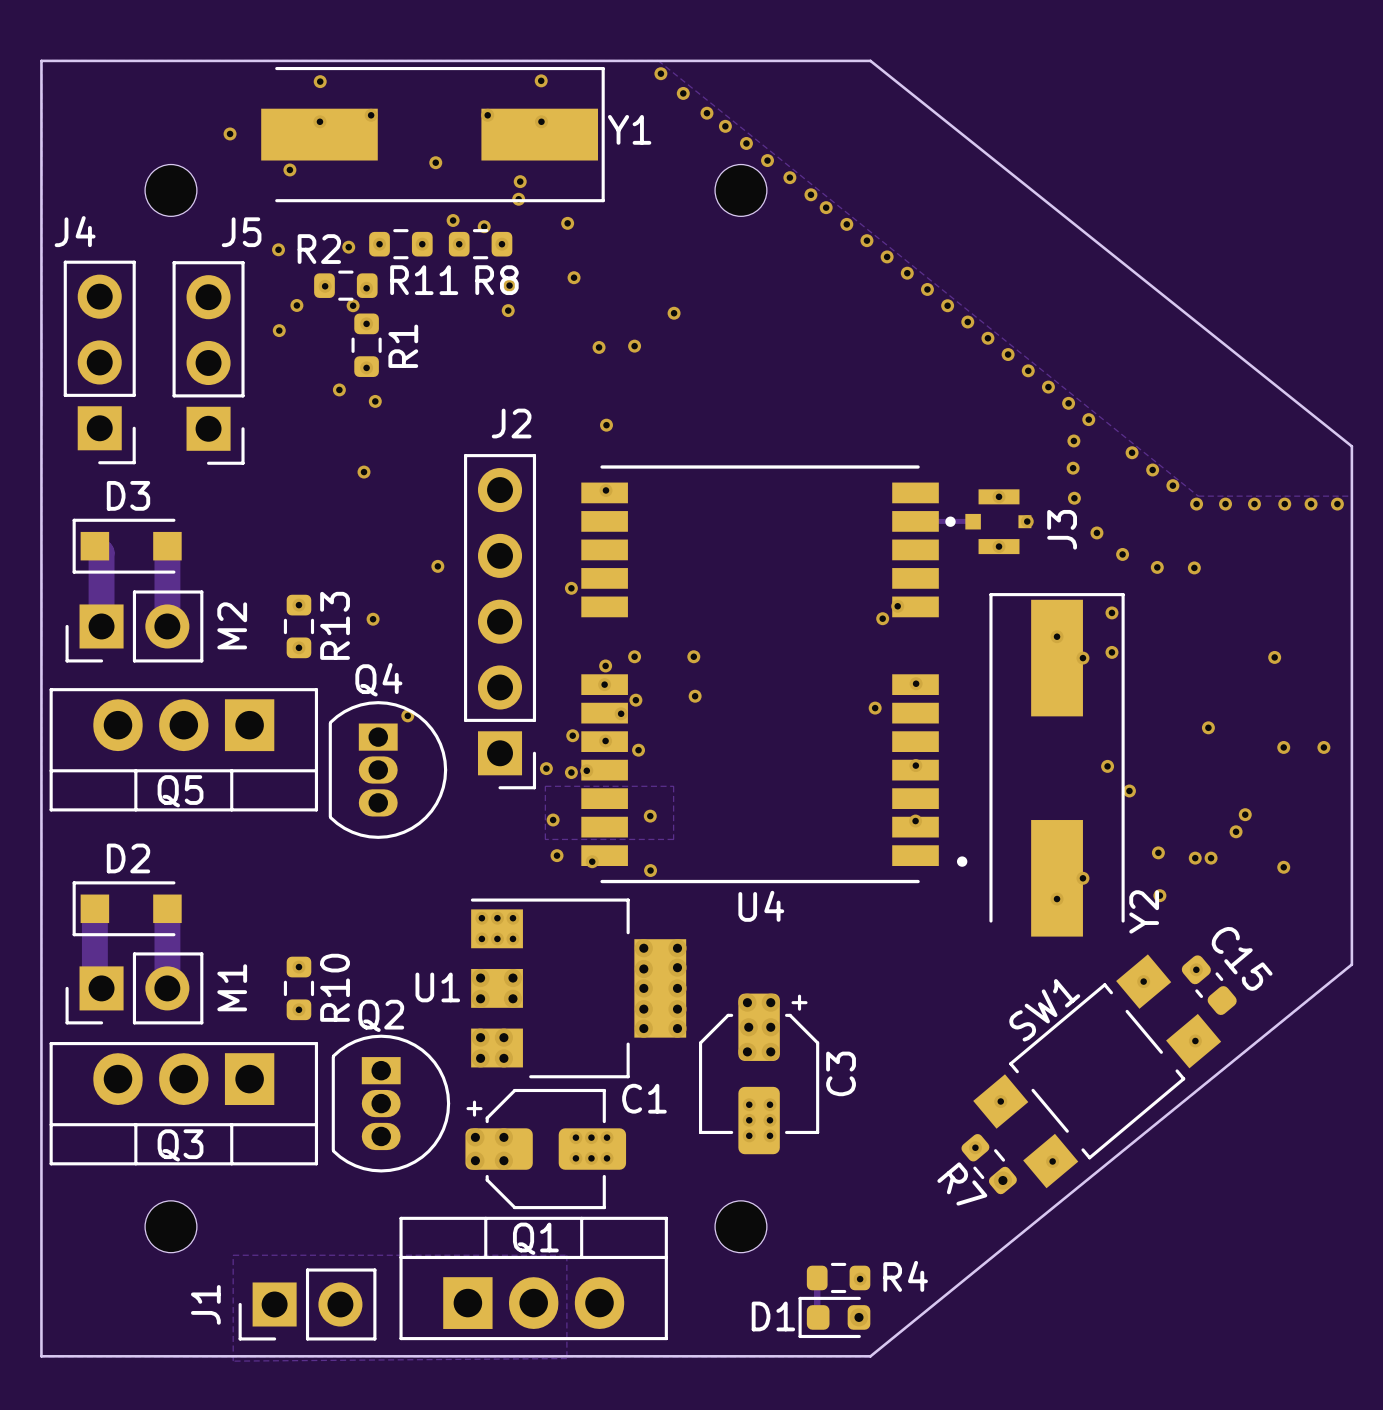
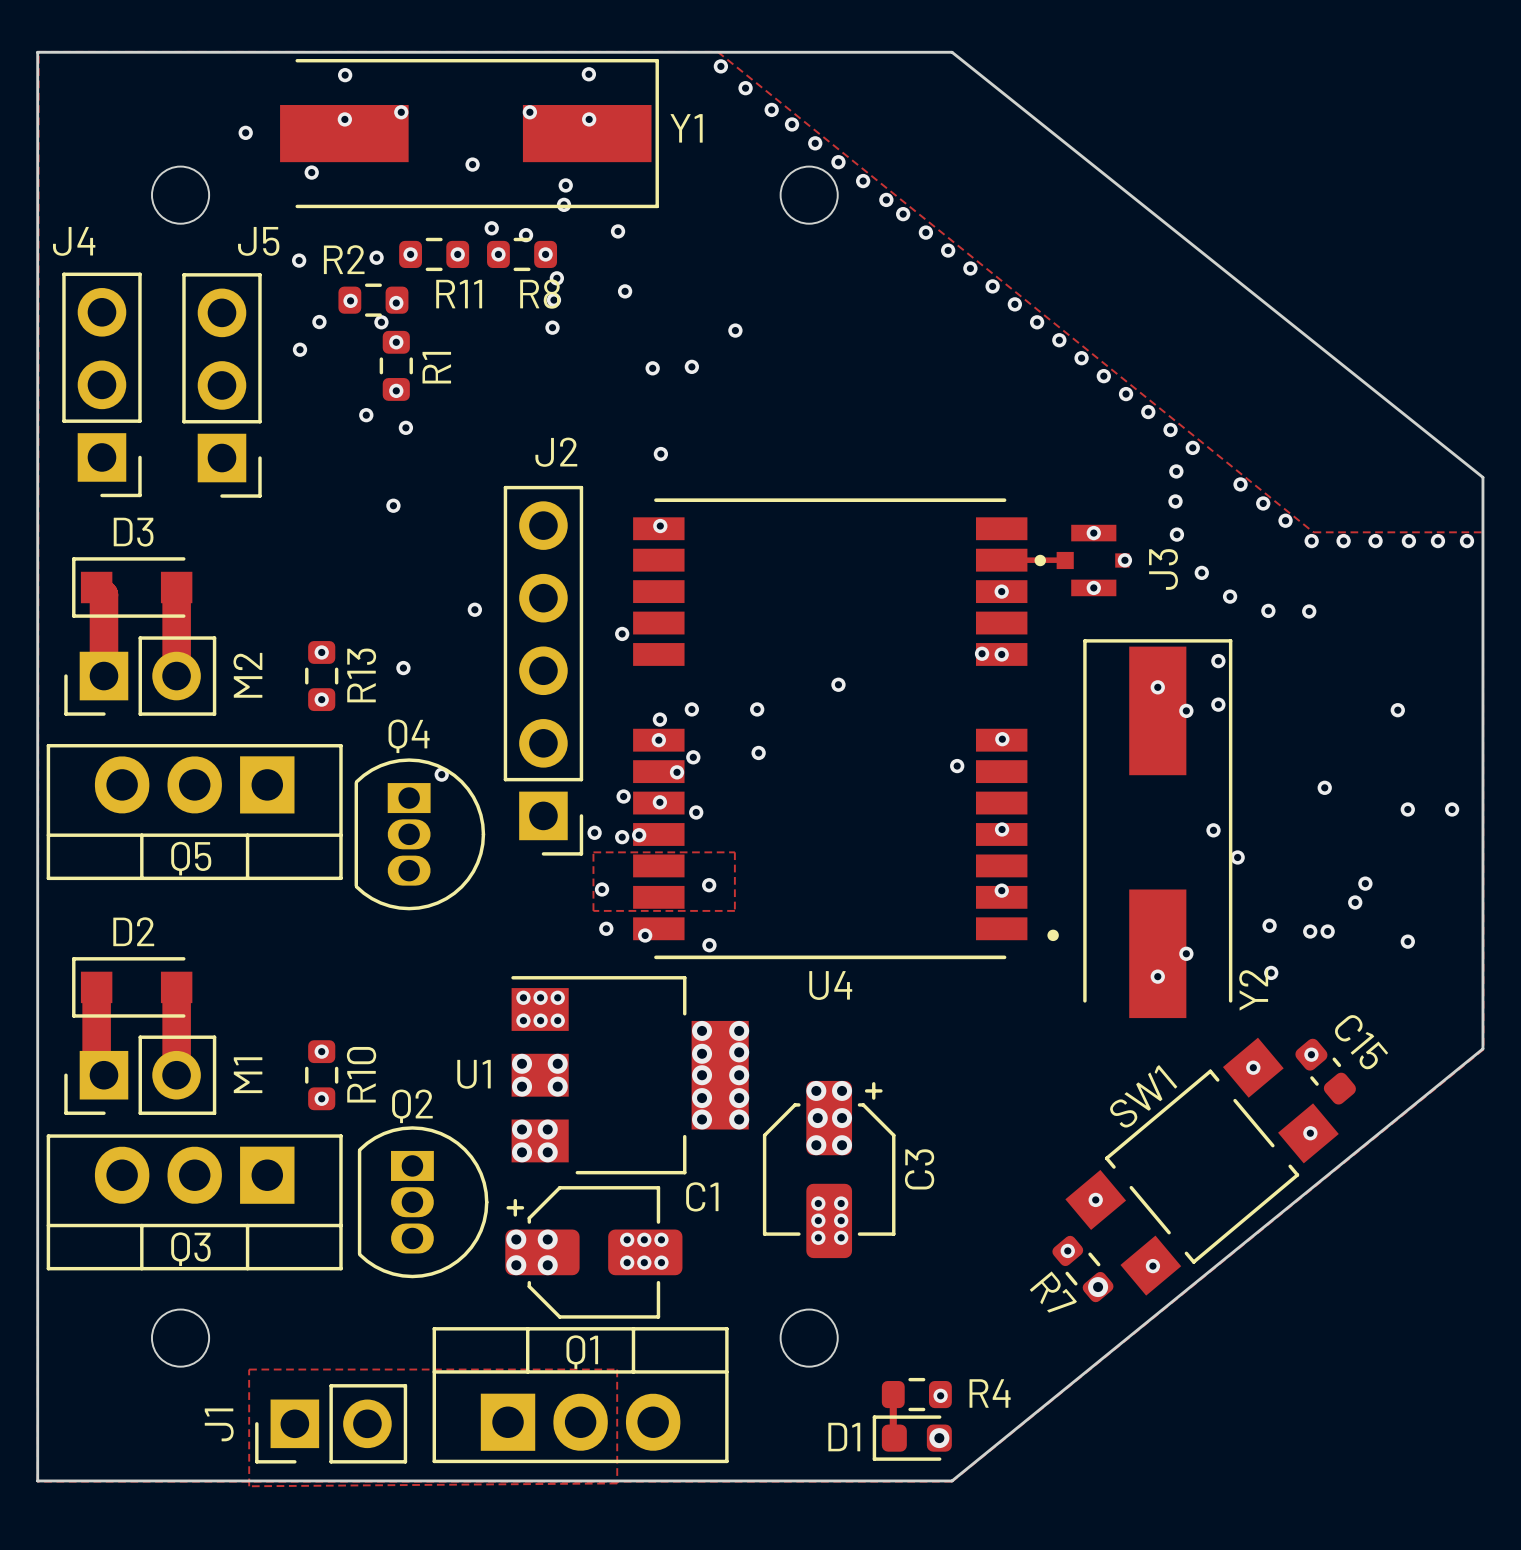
via: none -> (556, 278)
via: none -> (1001, 591)
via position: (882, 618) -> (1001, 654)
via: none -> (838, 684)

